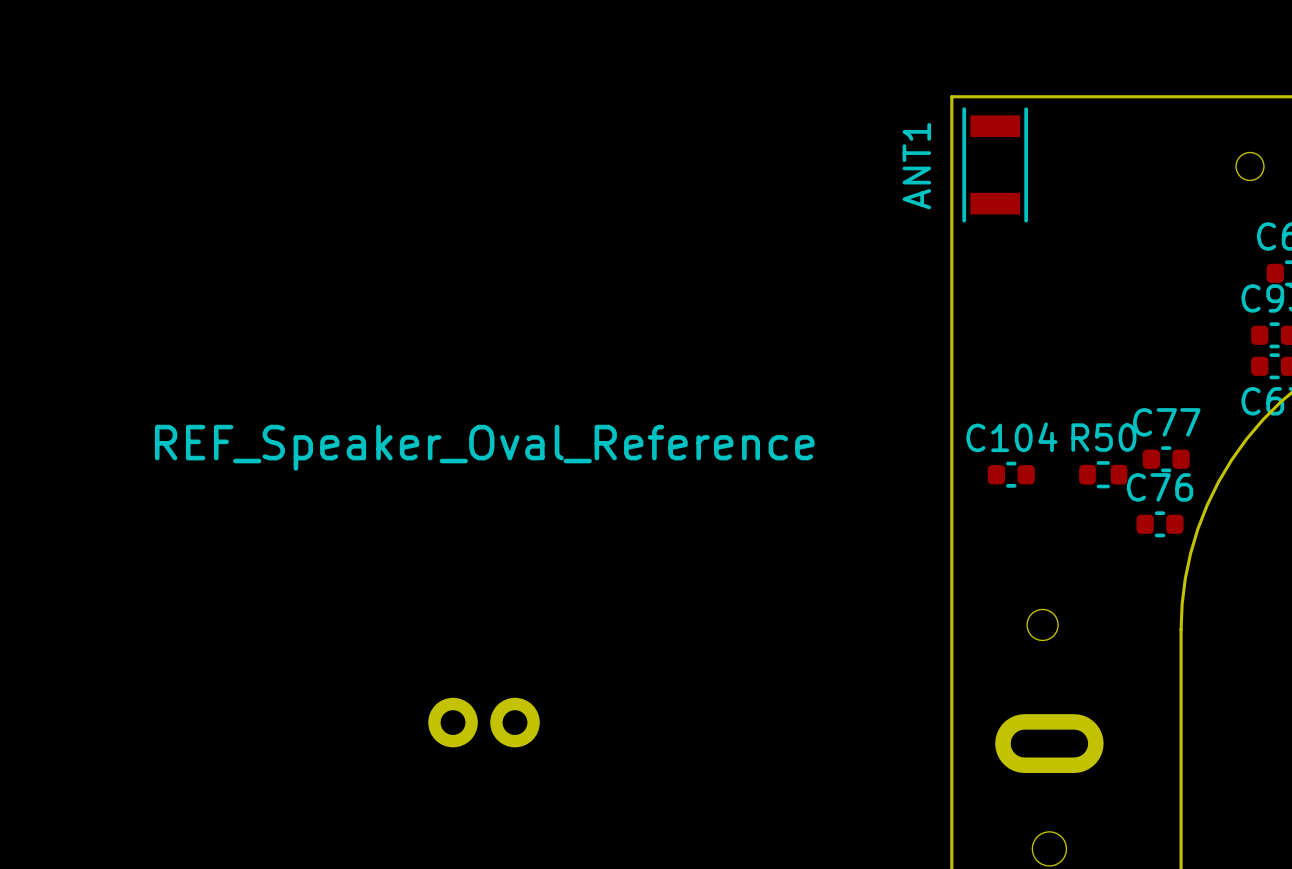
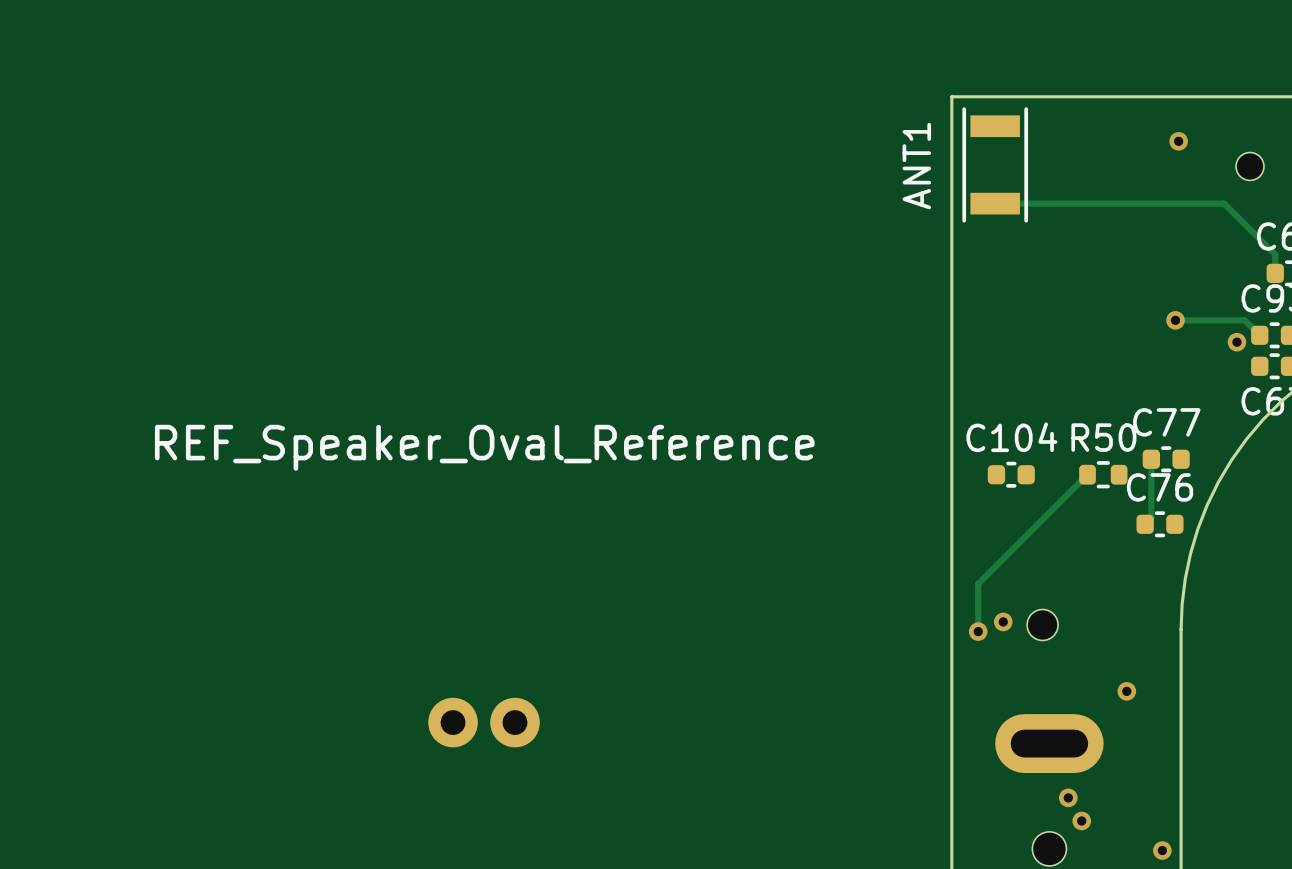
via: none -> (1178, 141)
track: none -> (995, 203) (1224, 203) (1275, 254) (1275, 273)
track: none -> (1175, 320) (1244, 320) (1259, 335)
via: none -> (1175, 320)
via: none -> (1236, 342)
track: none -> (1151, 459) (1151, 517) (1145, 524)
track: none -> (1087, 474) (978, 584) (978, 631)
via: none -> (1003, 621)
via: none -> (978, 631)
via: none -> (1126, 691)
via: none -> (1068, 797)
via: none -> (1081, 820)
via: none -> (1162, 850)

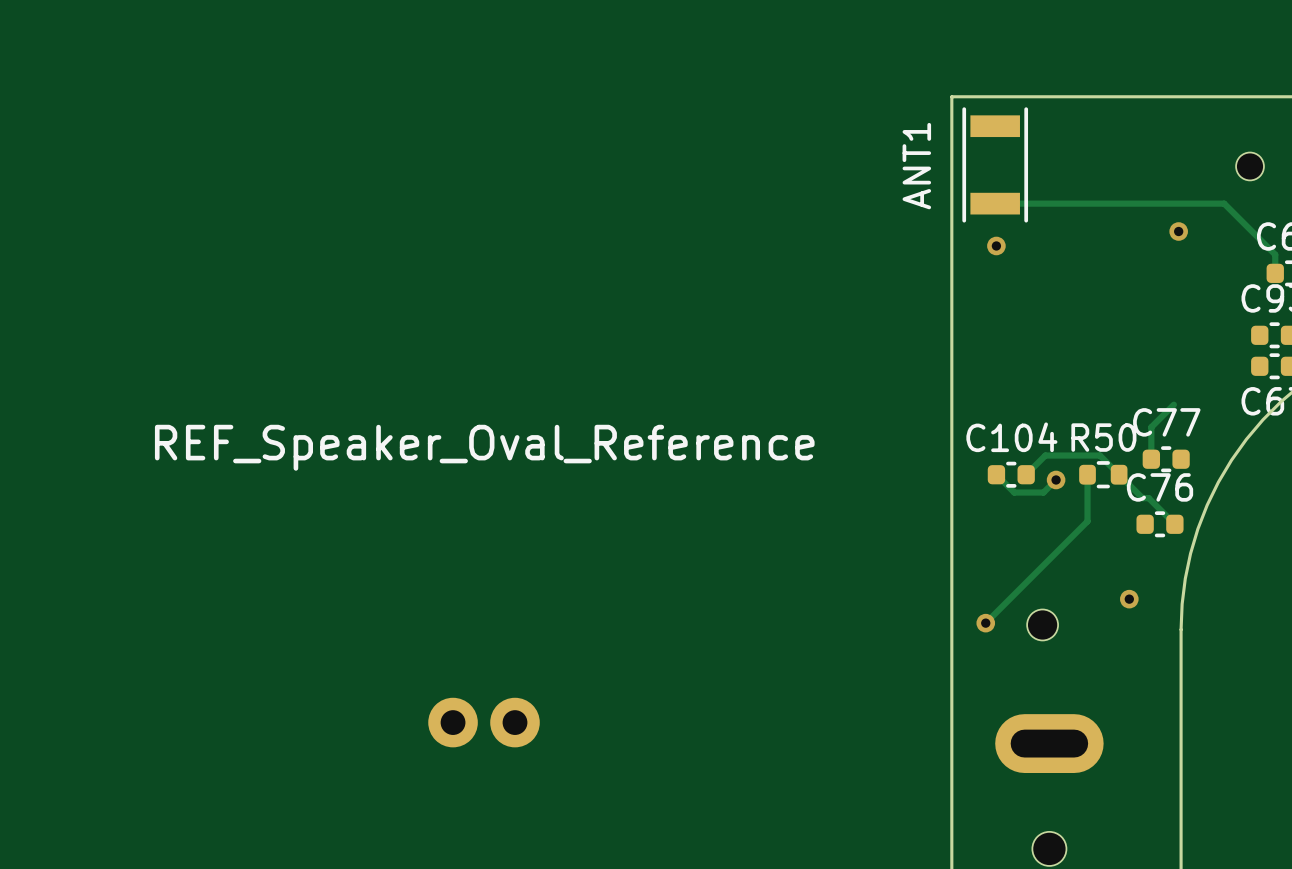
via: (1178, 141) -> none
via: none -> (1178, 231)
via: none -> (996, 245)
track: (1175, 320) (1244, 320) (1259, 335) -> none
via: (1175, 320) -> none
via: (1236, 342) -> none
track: (1151, 459) (1151, 517) (1145, 524) -> (1151, 459) (1151, 427) (1173, 404)
track: none -> (996, 474) (1014, 492) (1043, 492) (1056, 479)
track: none -> (1026, 474) (1045, 455) (1099, 455) (1142, 498) (1148, 498) (1174, 524)
track: (1087, 474) (978, 584) (978, 631) -> (1087, 474) (1087, 521) (985, 623)
via: none -> (1056, 479)
via: none -> (1129, 599)
via: (1003, 621) -> none
via: none -> (985, 623)
via: (978, 631) -> none
via: (1126, 691) -> none
via: (1068, 797) -> none
via: (1081, 820) -> none
via: (1162, 850) -> none

